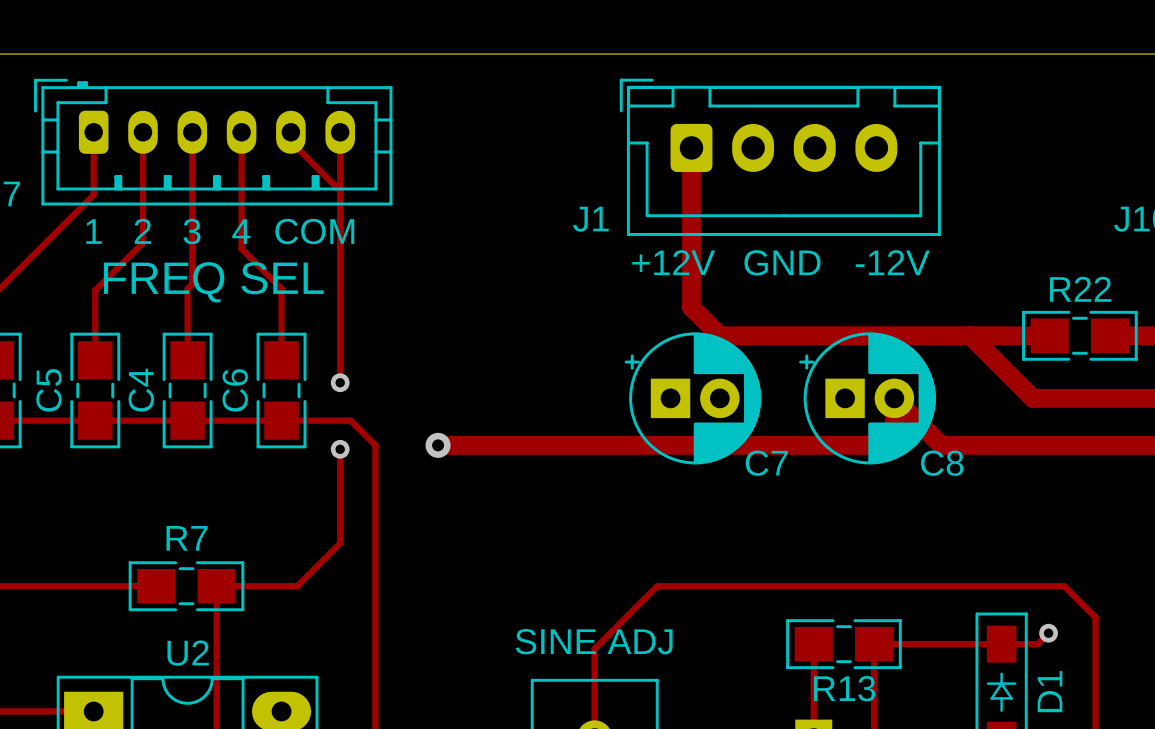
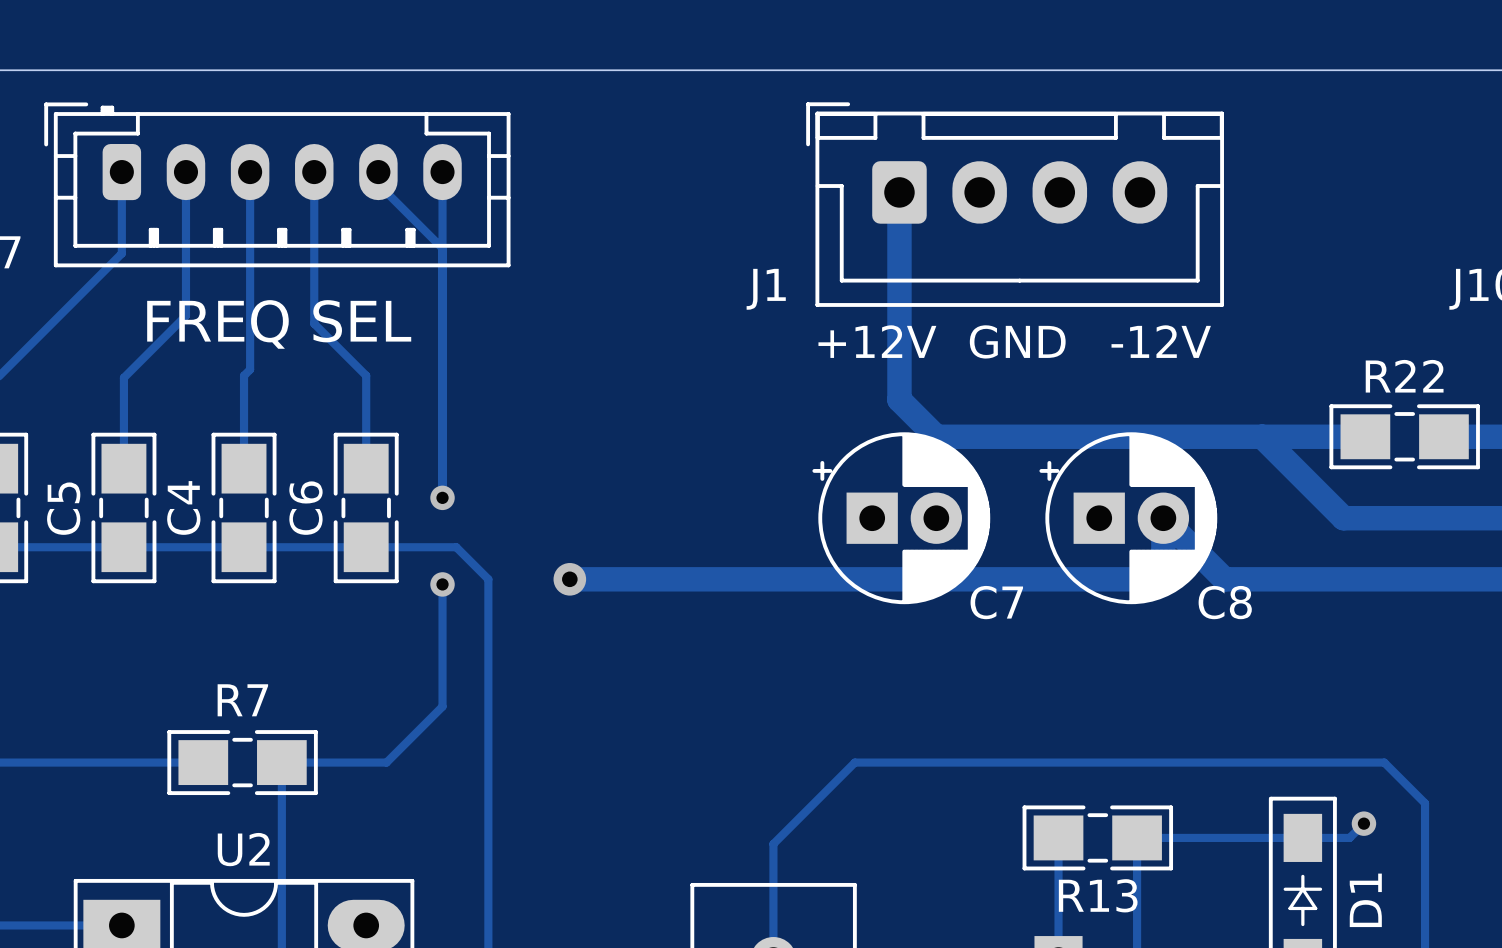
text: 1 (93, 231) -> none
text: 2 (142, 231) -> none
text: 3 (192, 231) -> none
text: 4 (241, 231) -> none
text: COM (314, 231) -> none
text position: FREQ SEL (213, 282) -> FREQ SEL (279, 324)
text: SINE ADJ (594, 641) -> none

